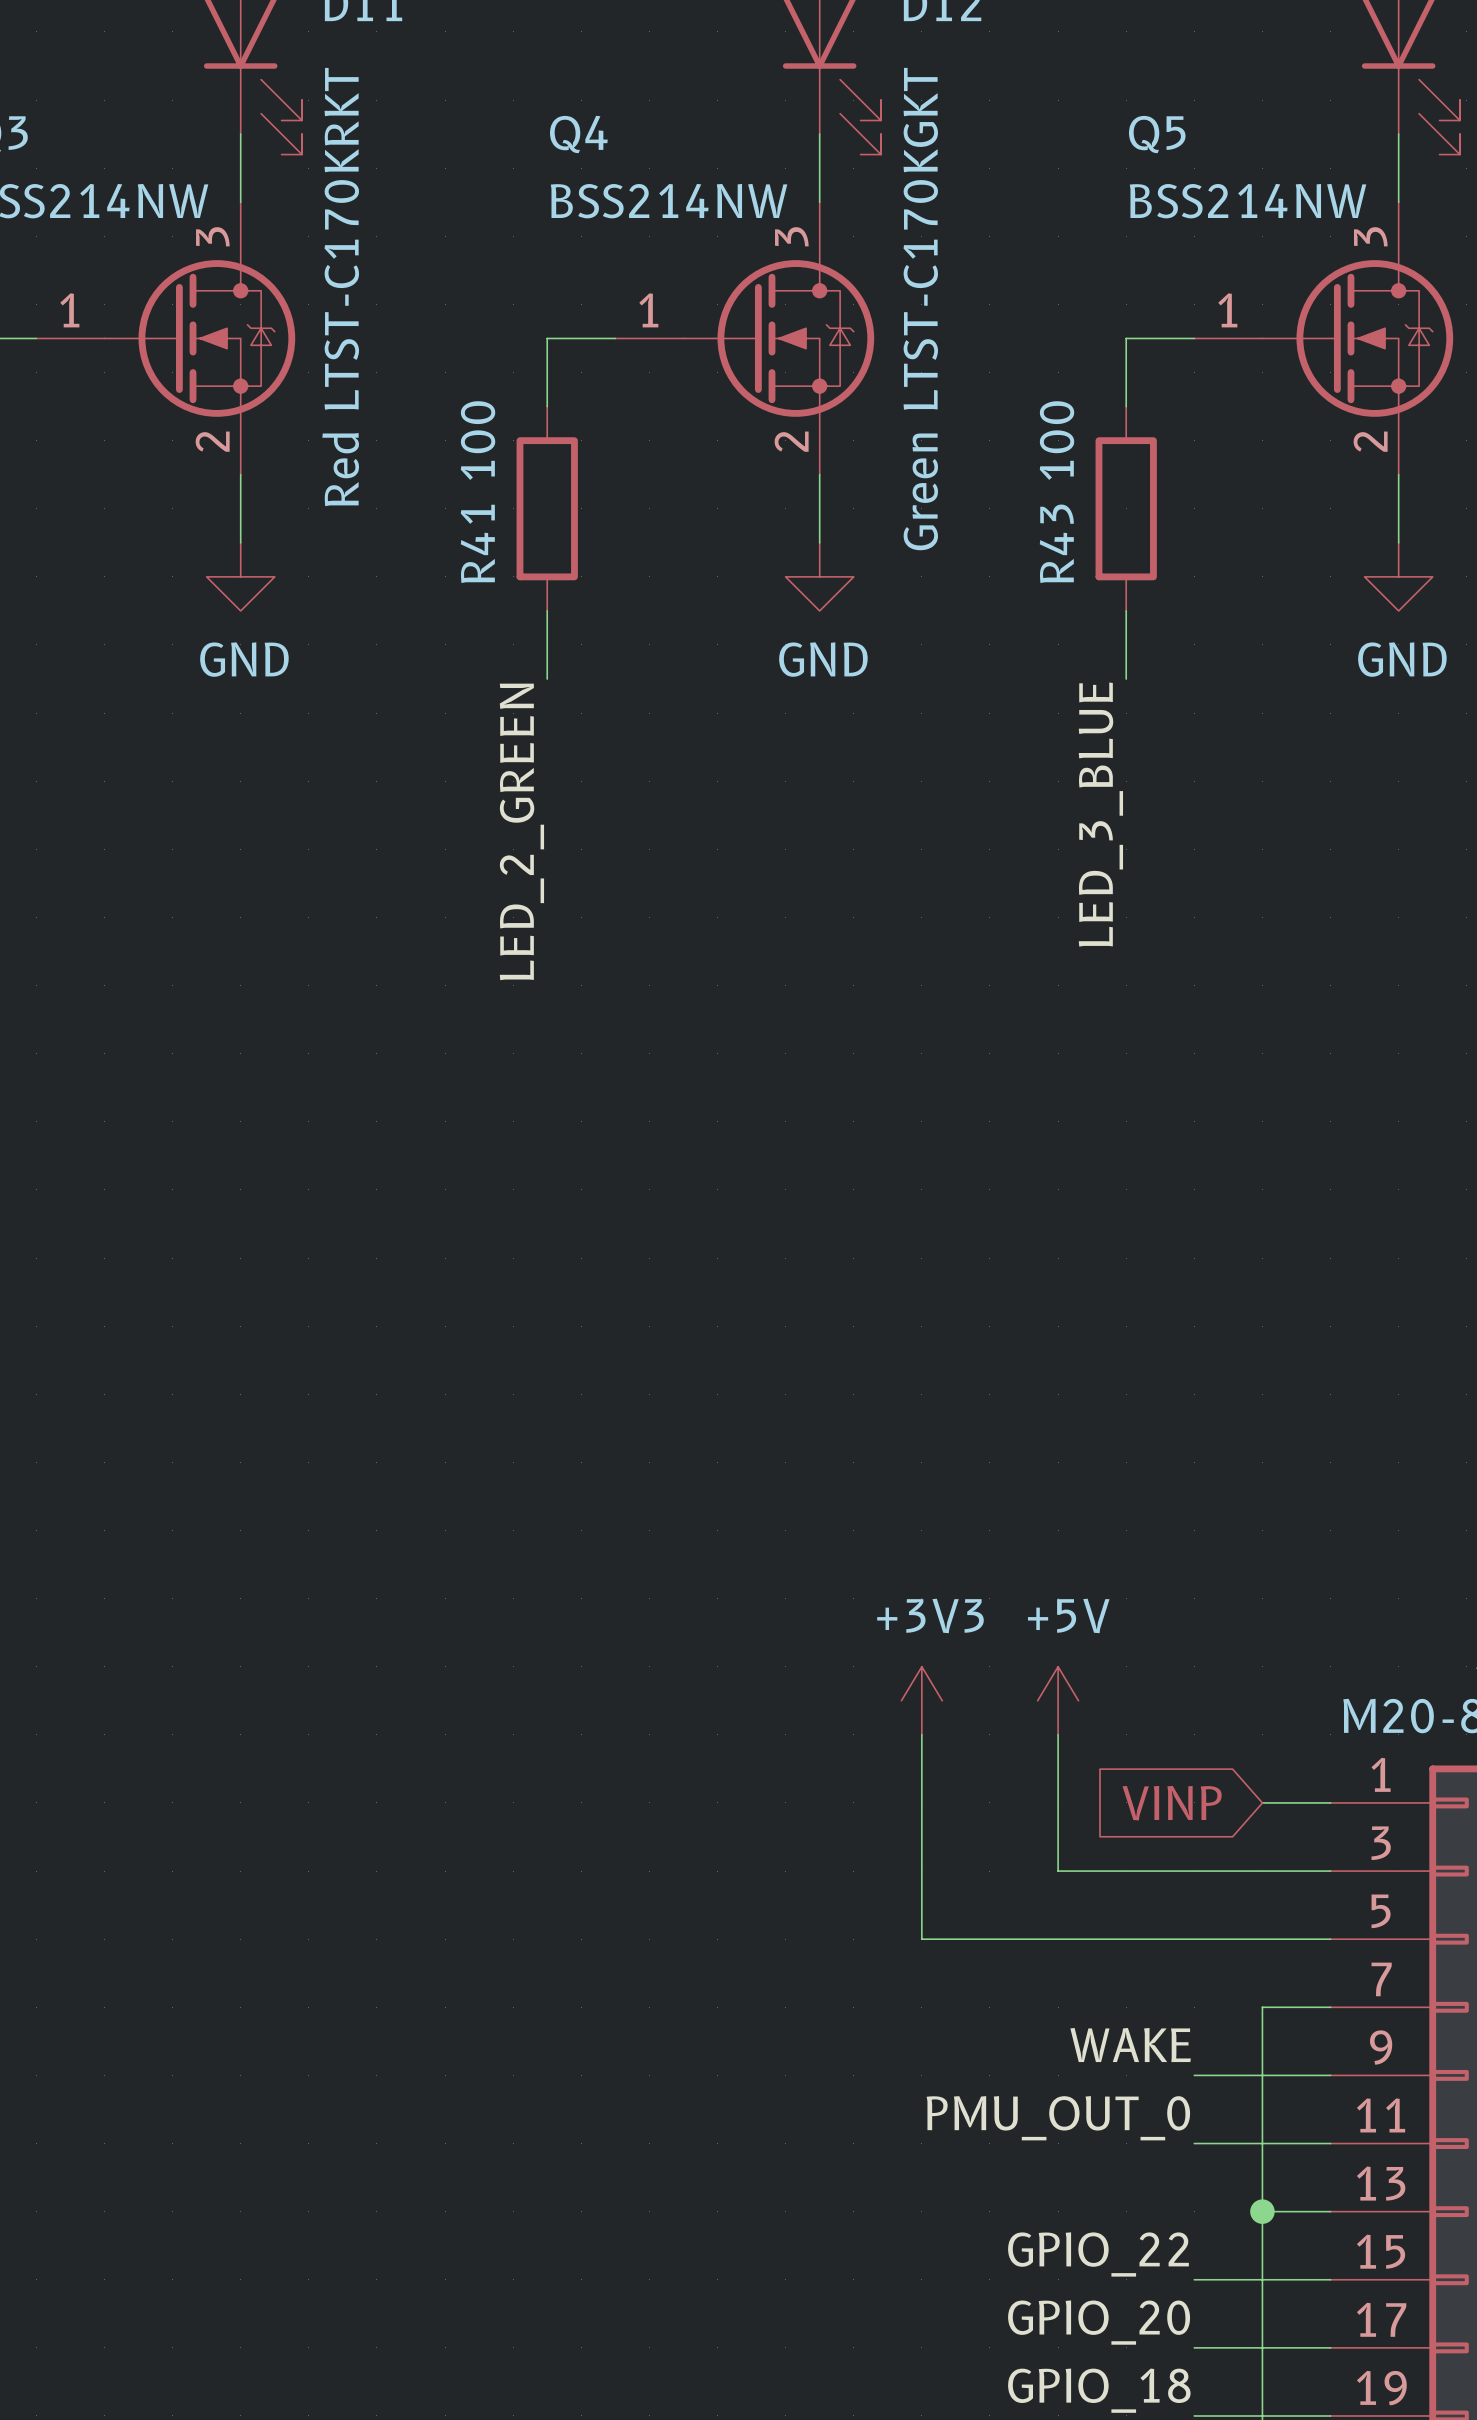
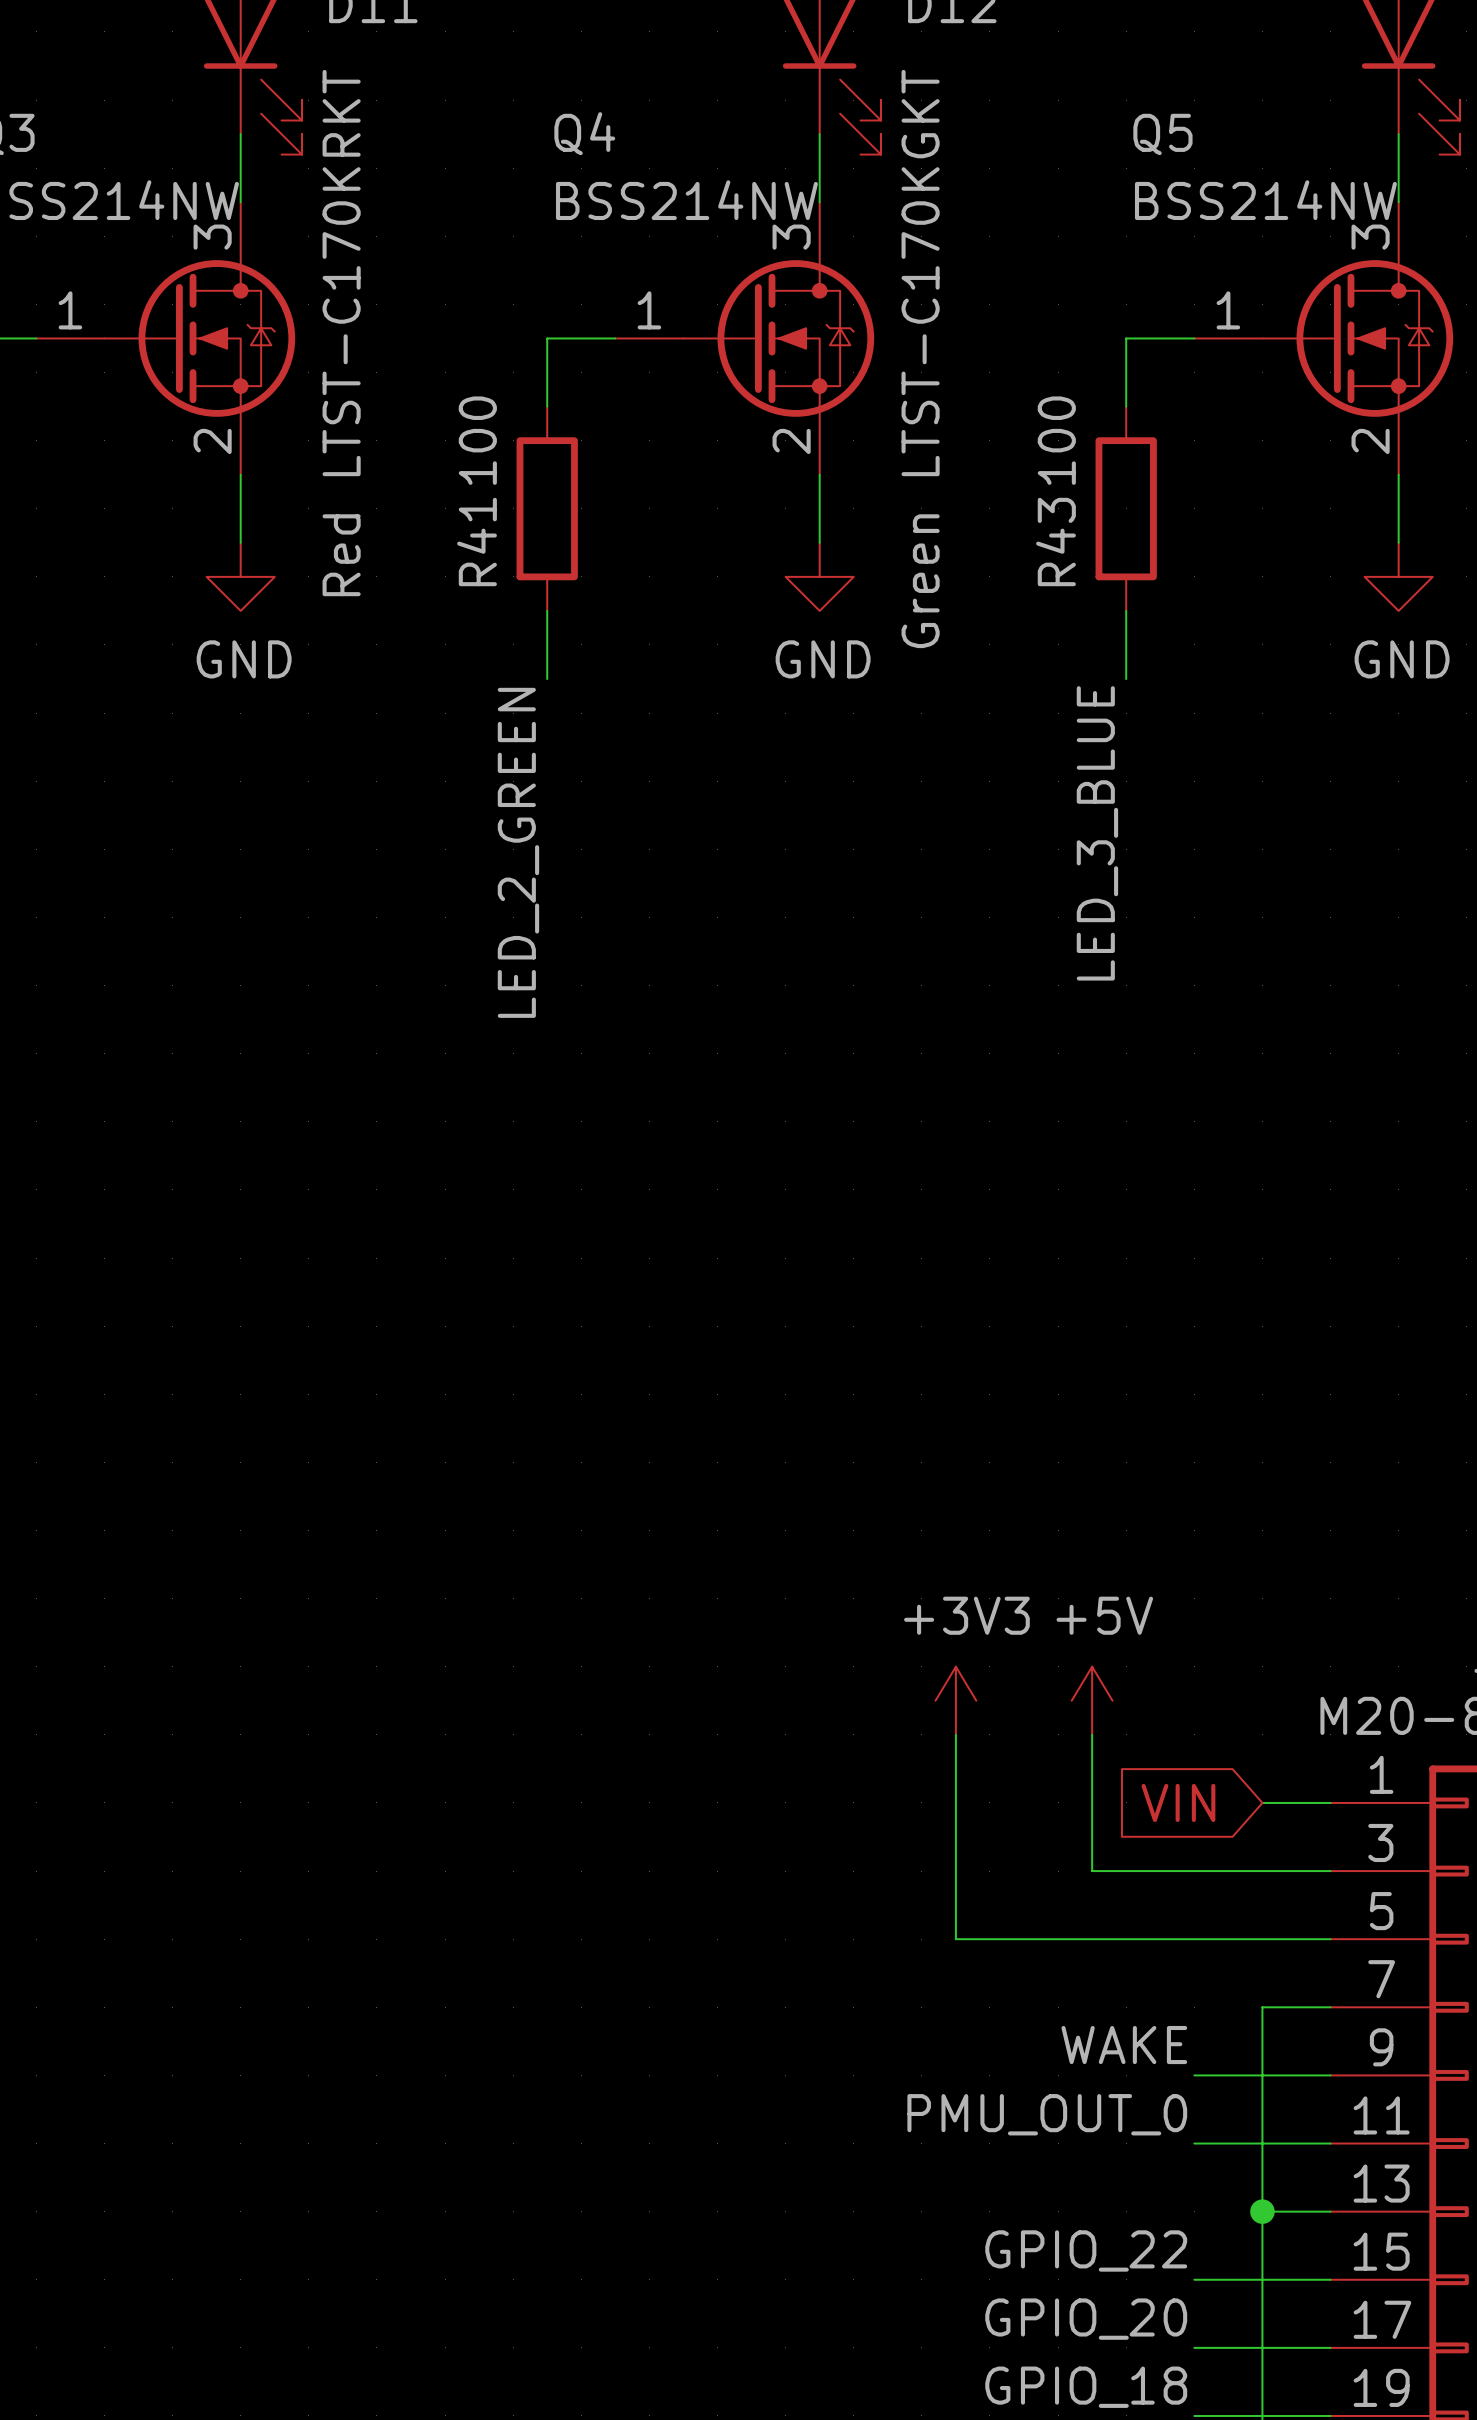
power symbol position: +3V3 (921, 1700) -> +3V3 (955, 1700)
power symbol position: +5V (1058, 1700) -> +5V (1092, 1700)
wire: (921, 1734) (921, 1939) (955, 1939) -> (955, 1734) (955, 1939)
wire: (1058, 1734) (1058, 1871) (1092, 1871) -> (1092, 1734) (1092, 1871)
global label: VINP (1172, 1803) -> VIN (1178, 1802)

